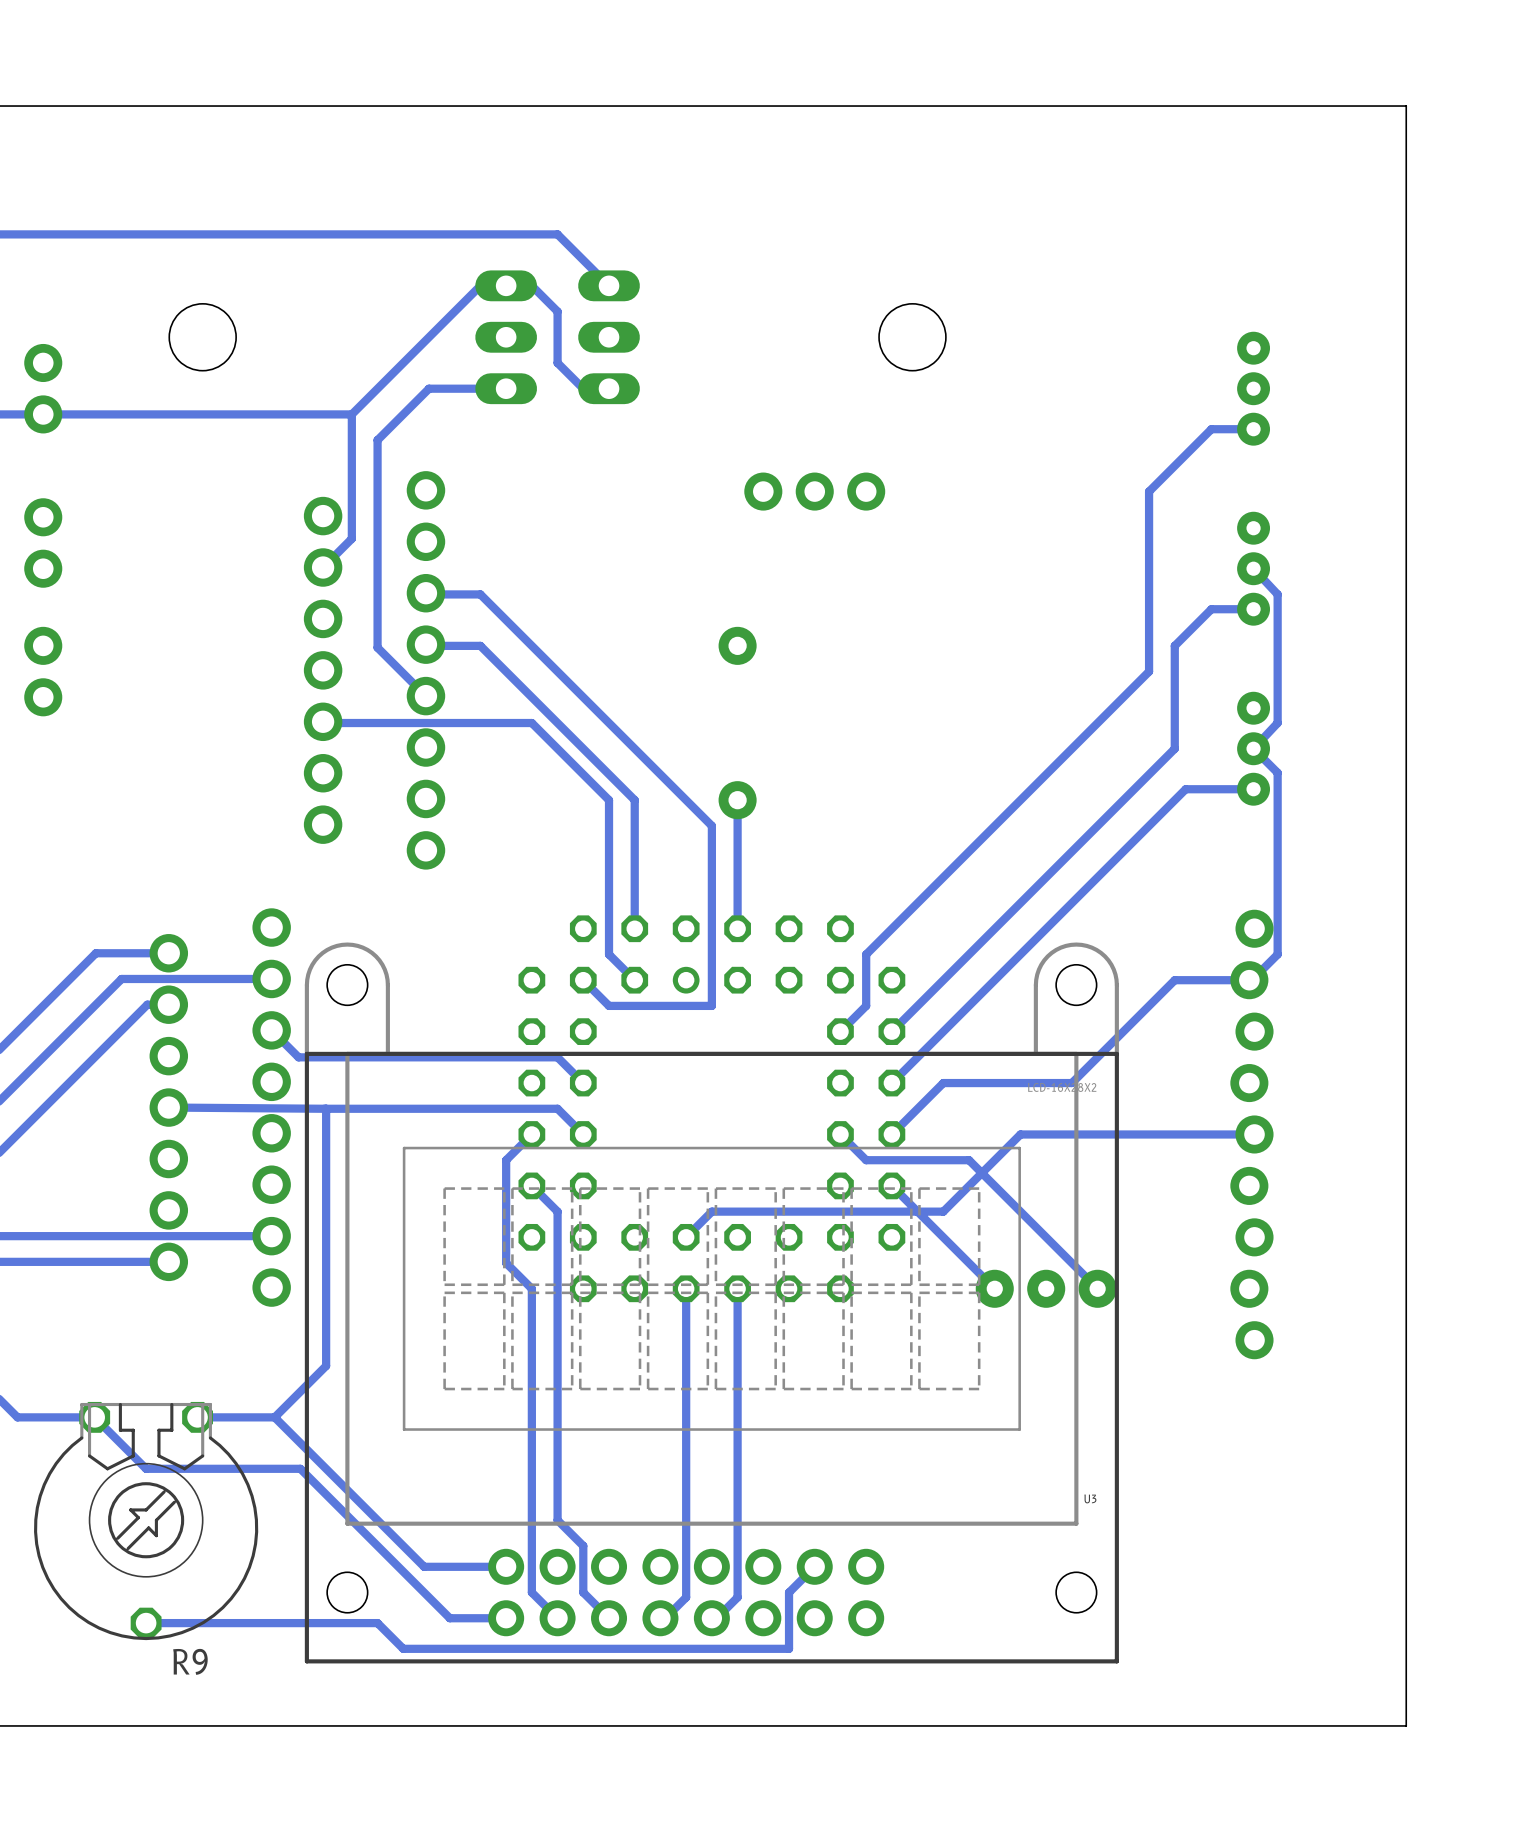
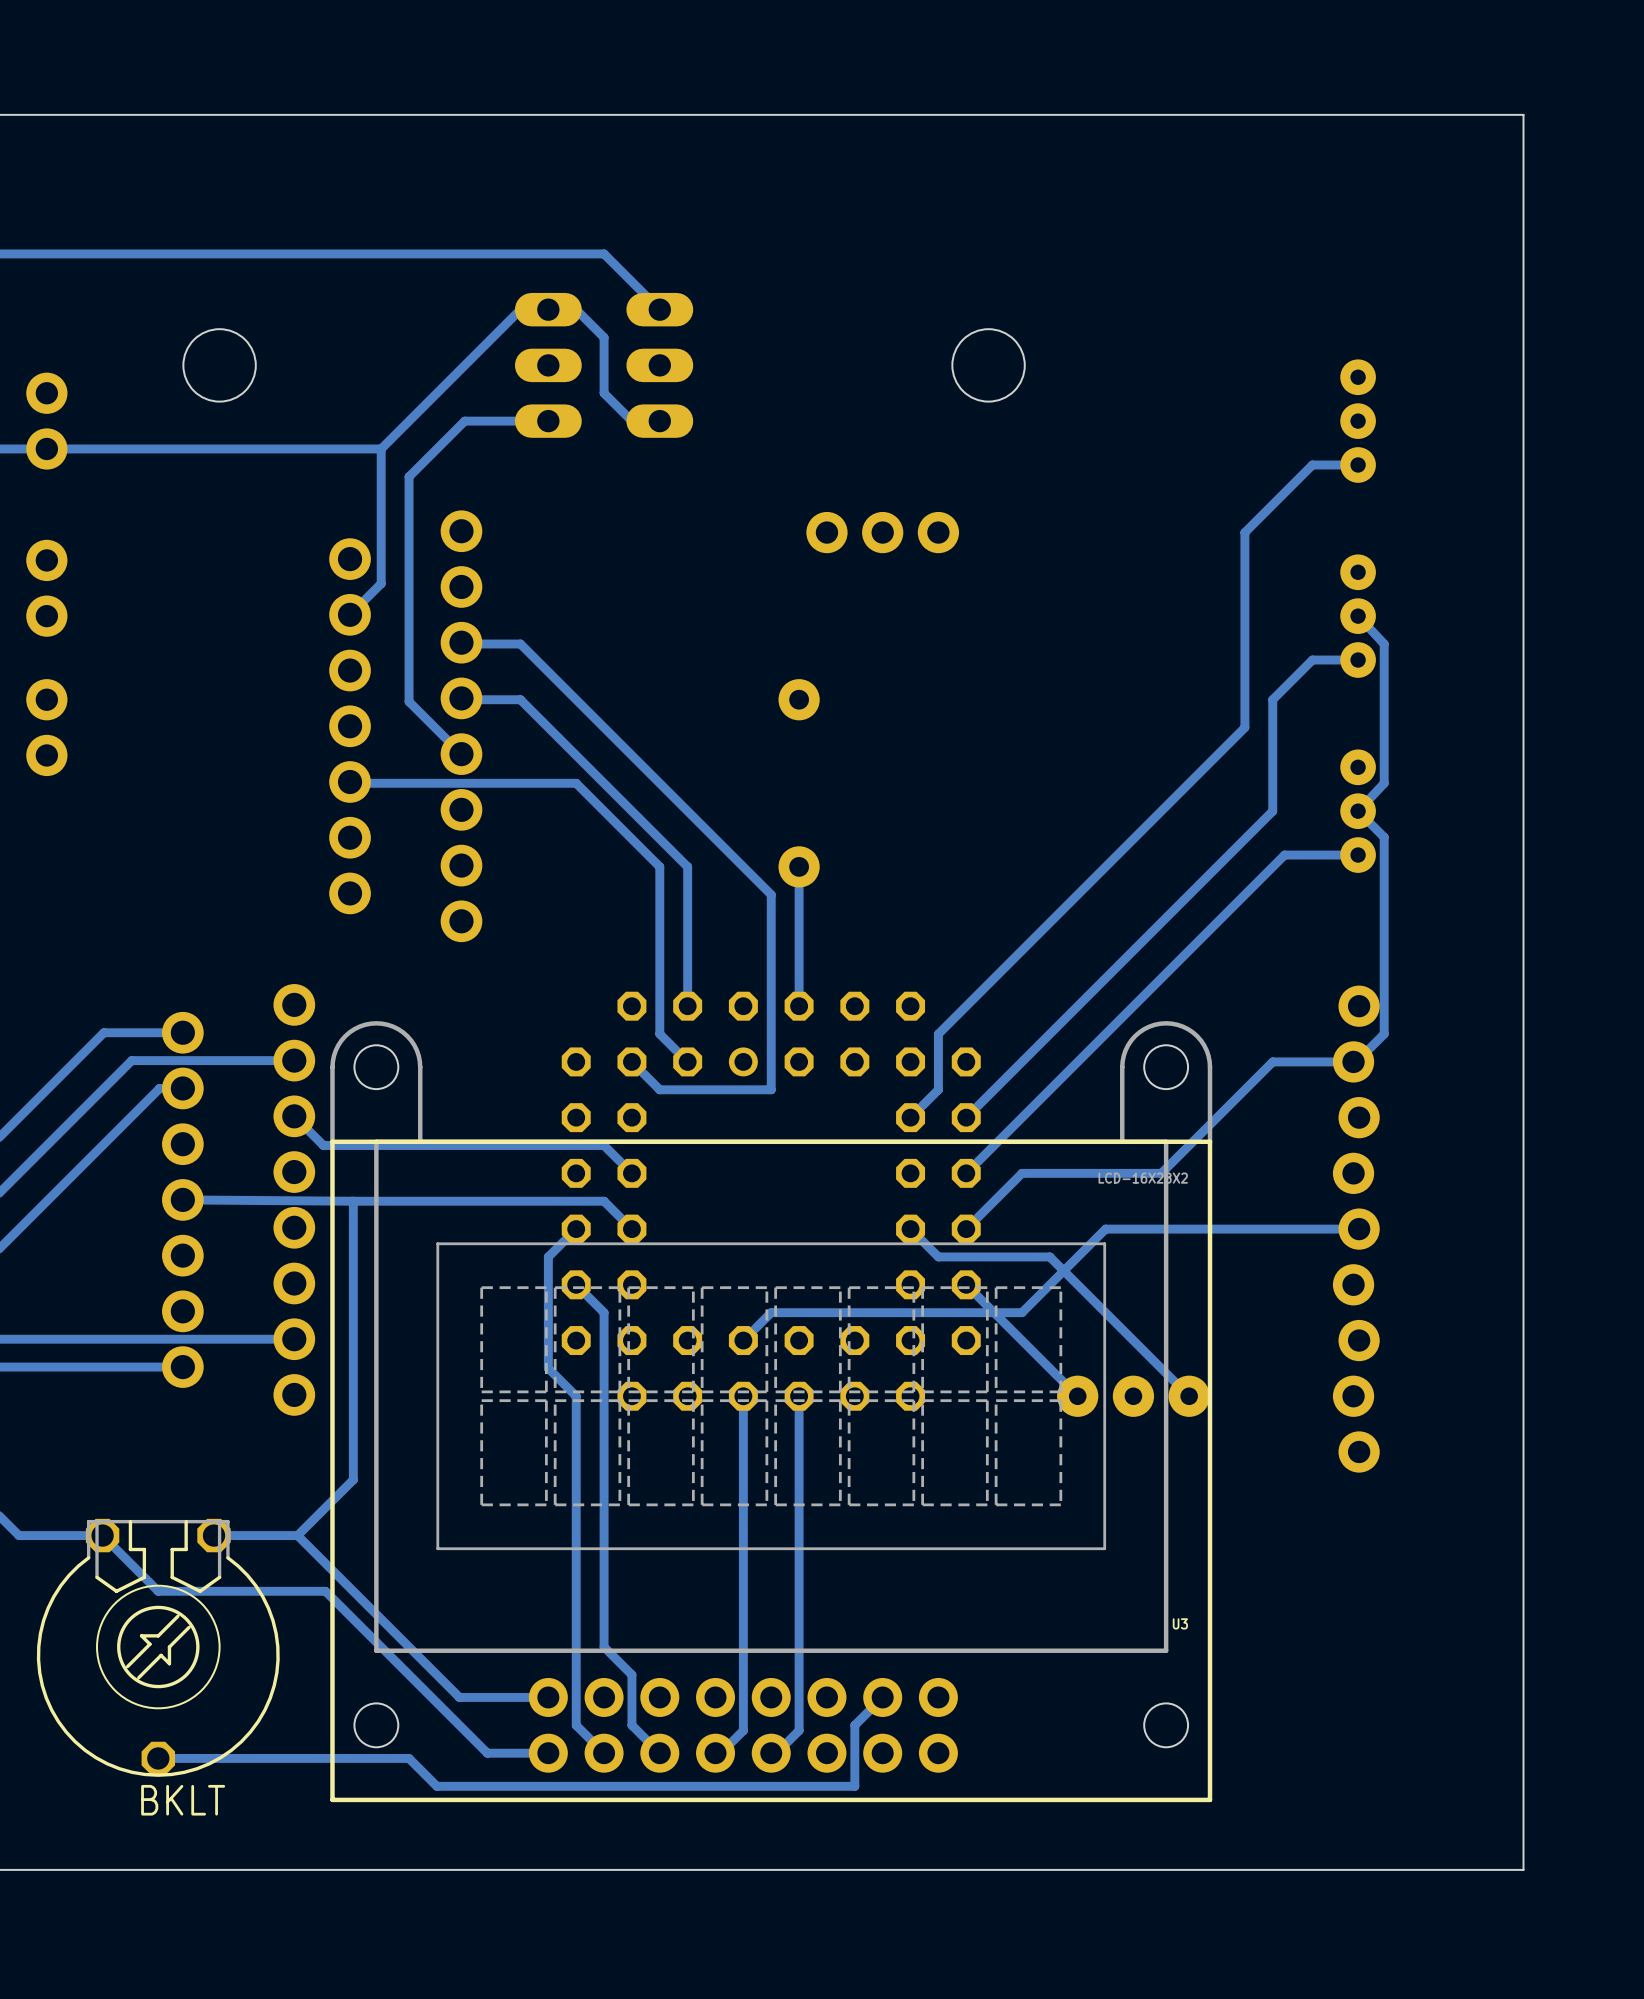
R9 name: R9 (190, 1661) -> BKLT (183, 1800)

